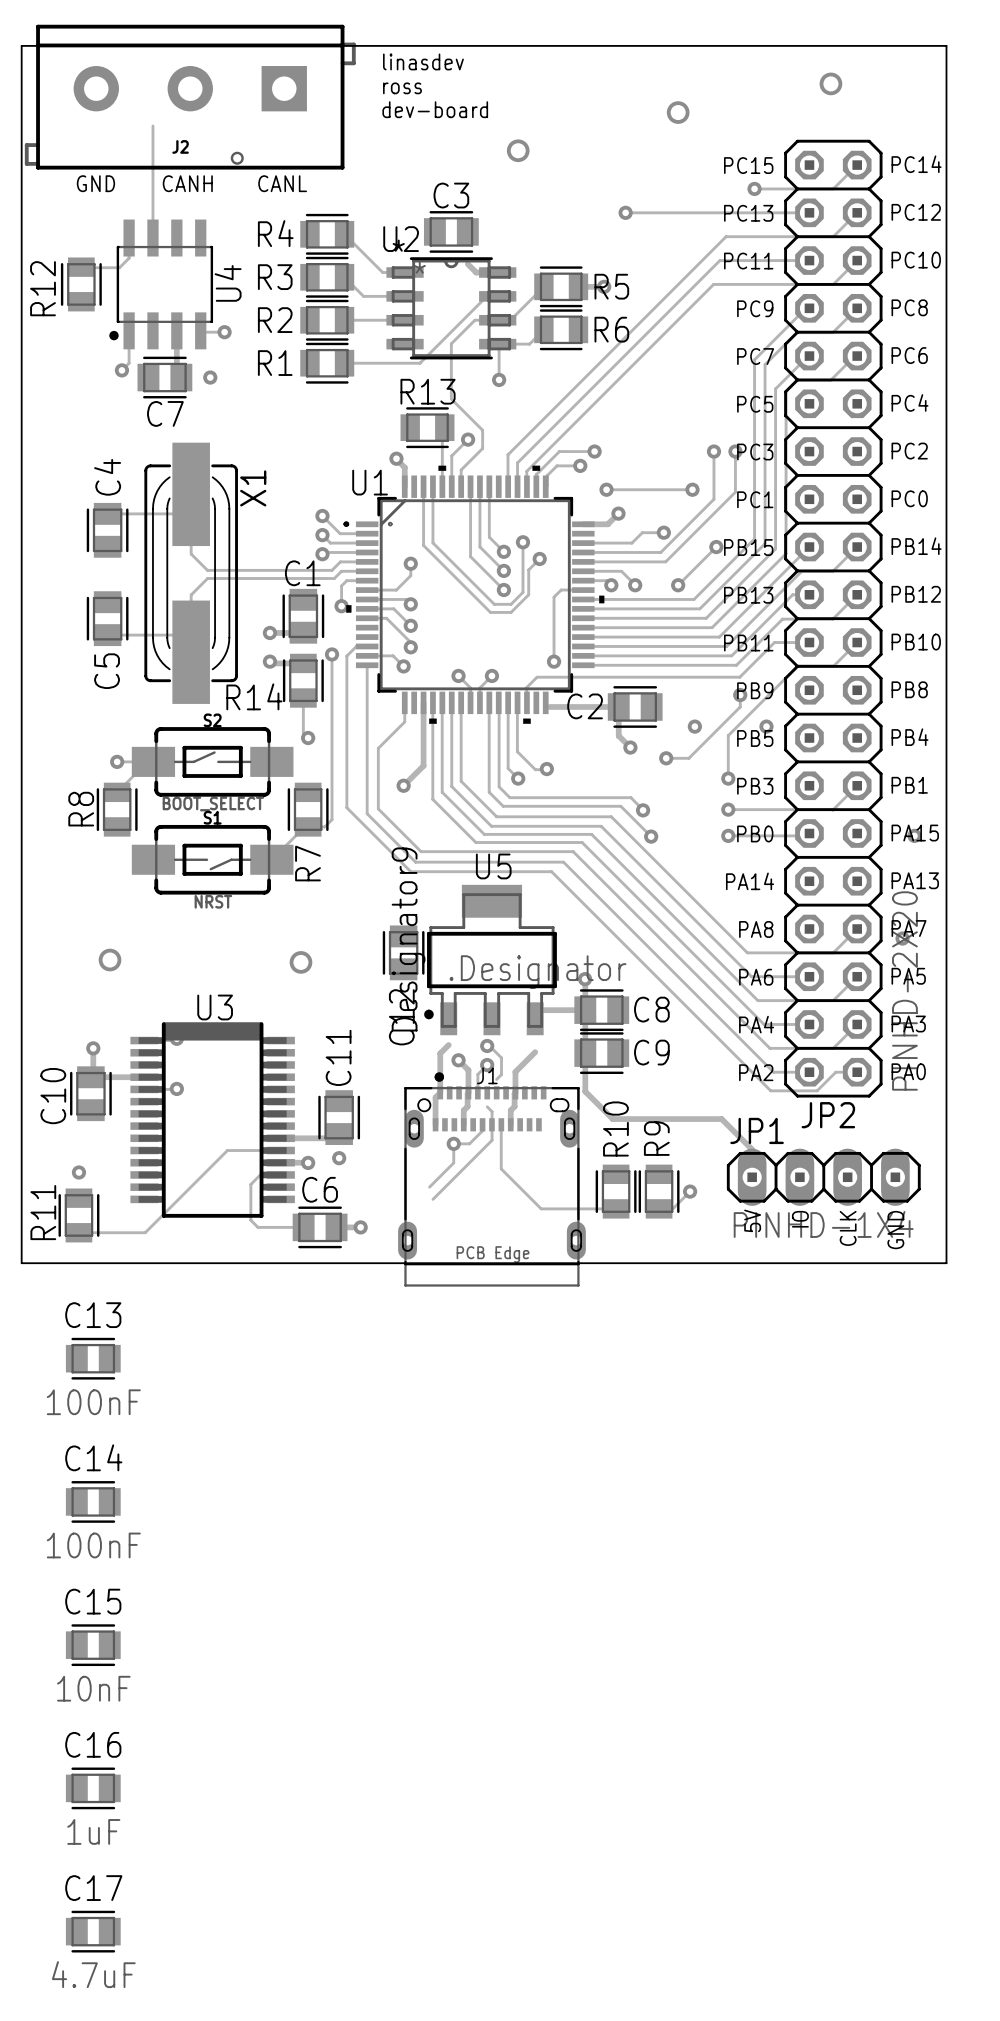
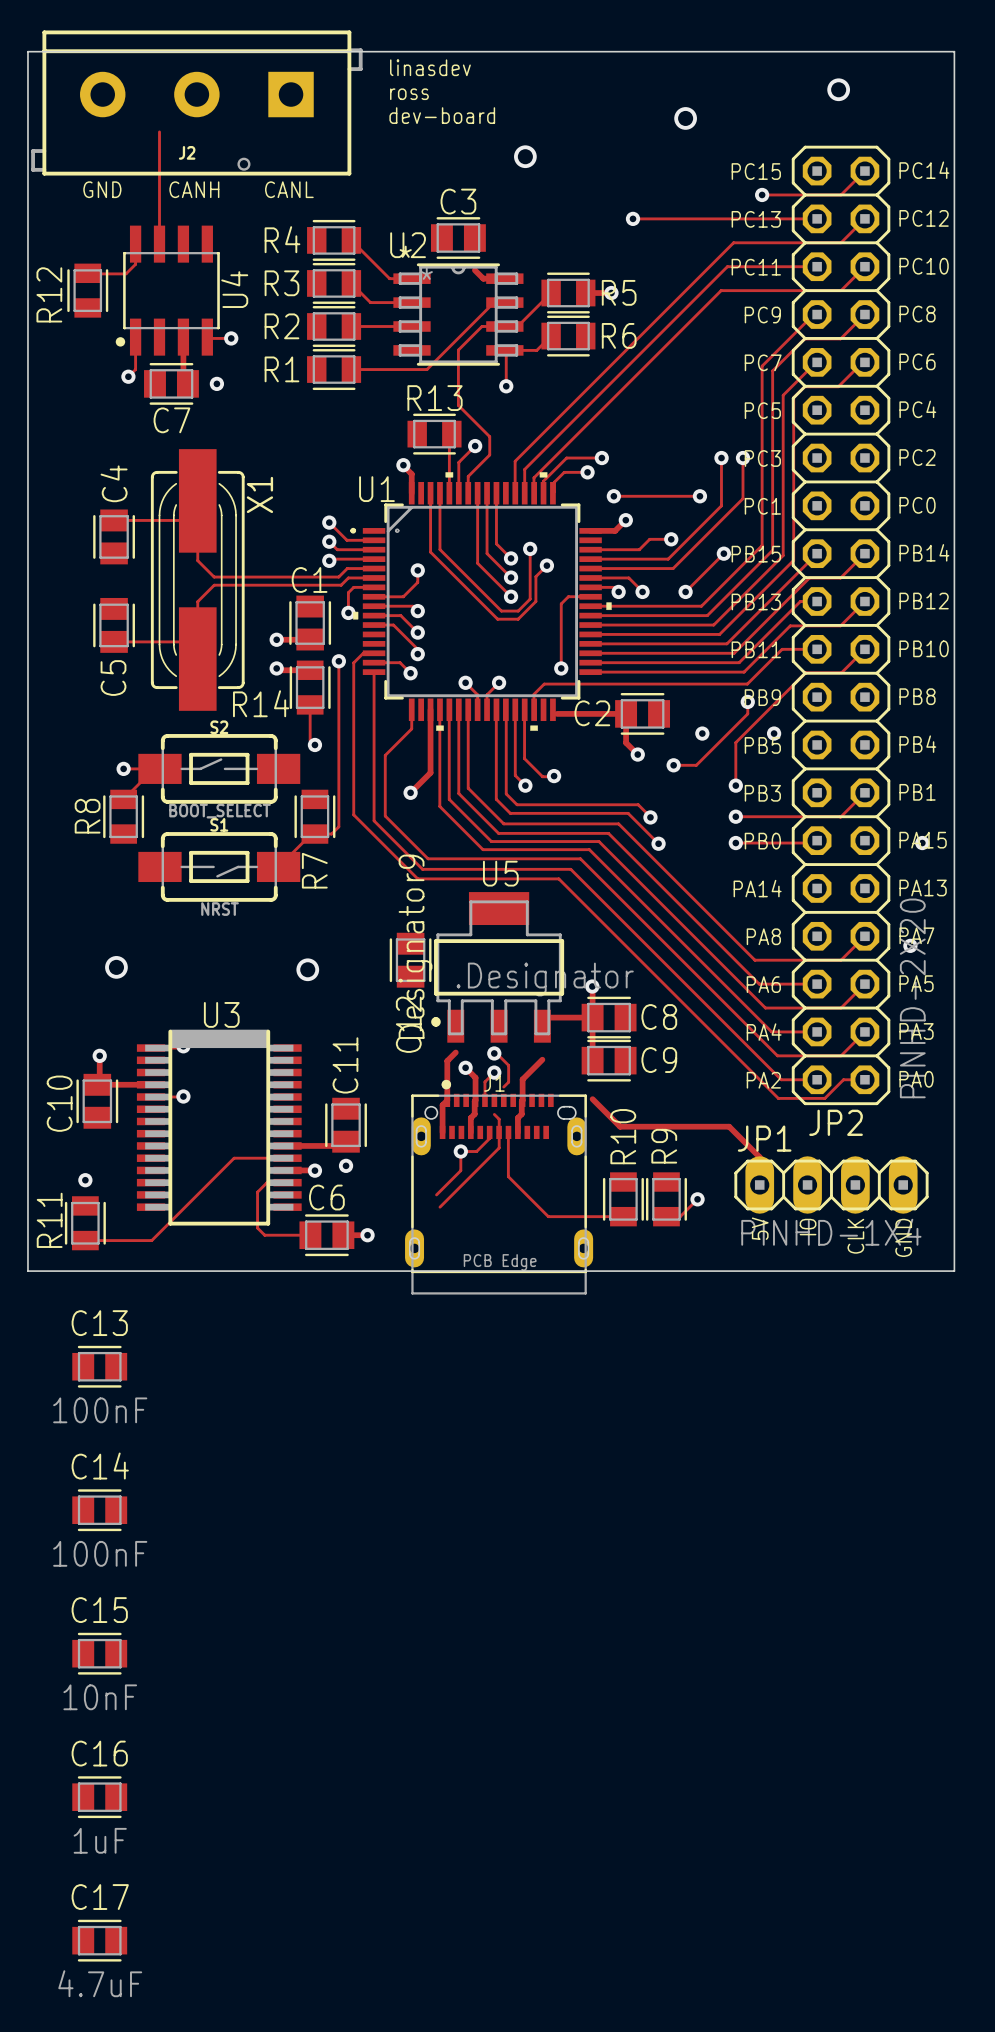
track: (585, 1053) (585, 1091) -> none

